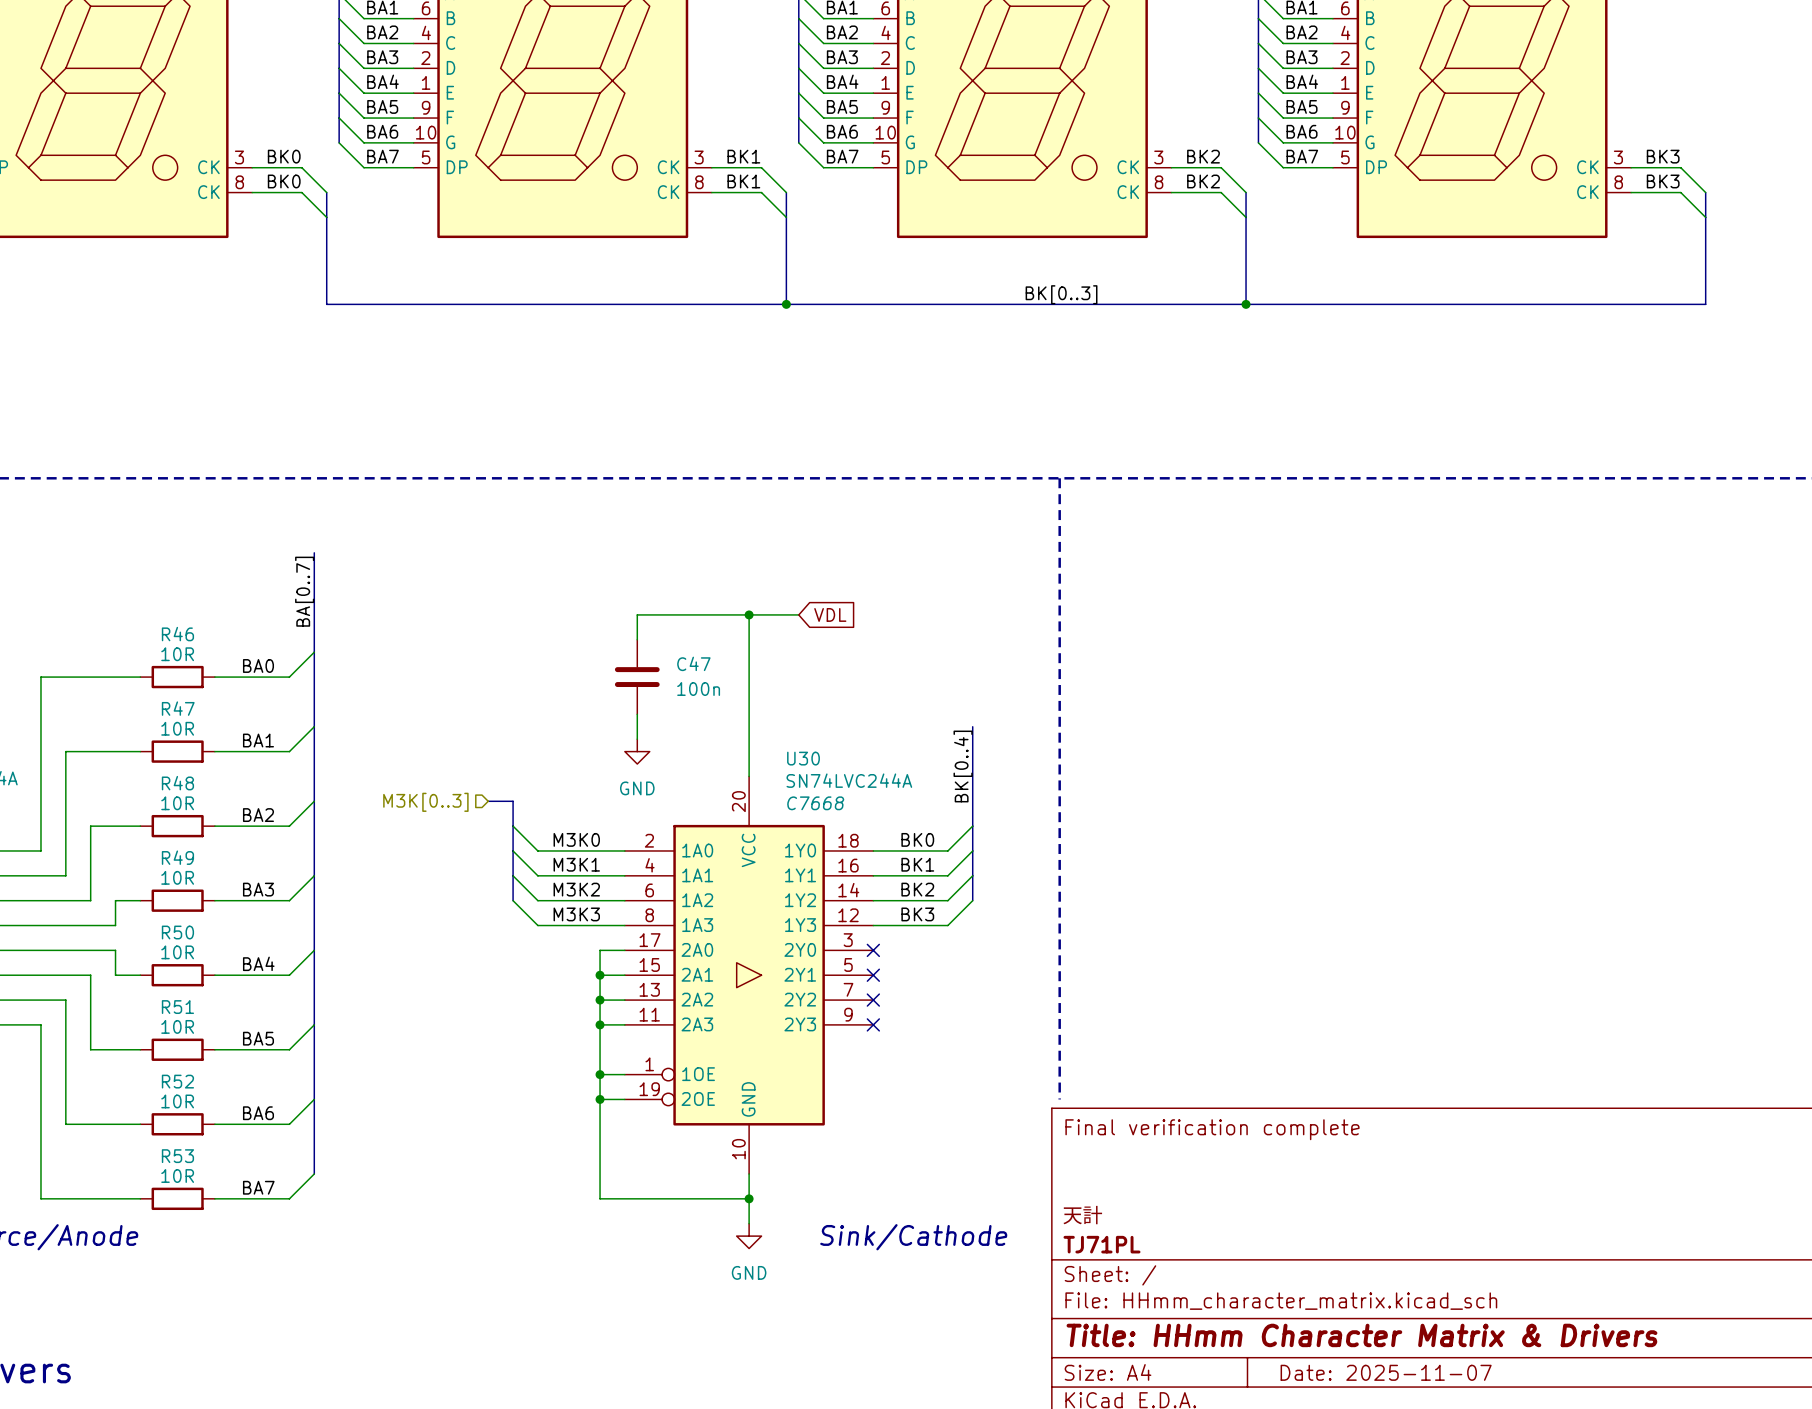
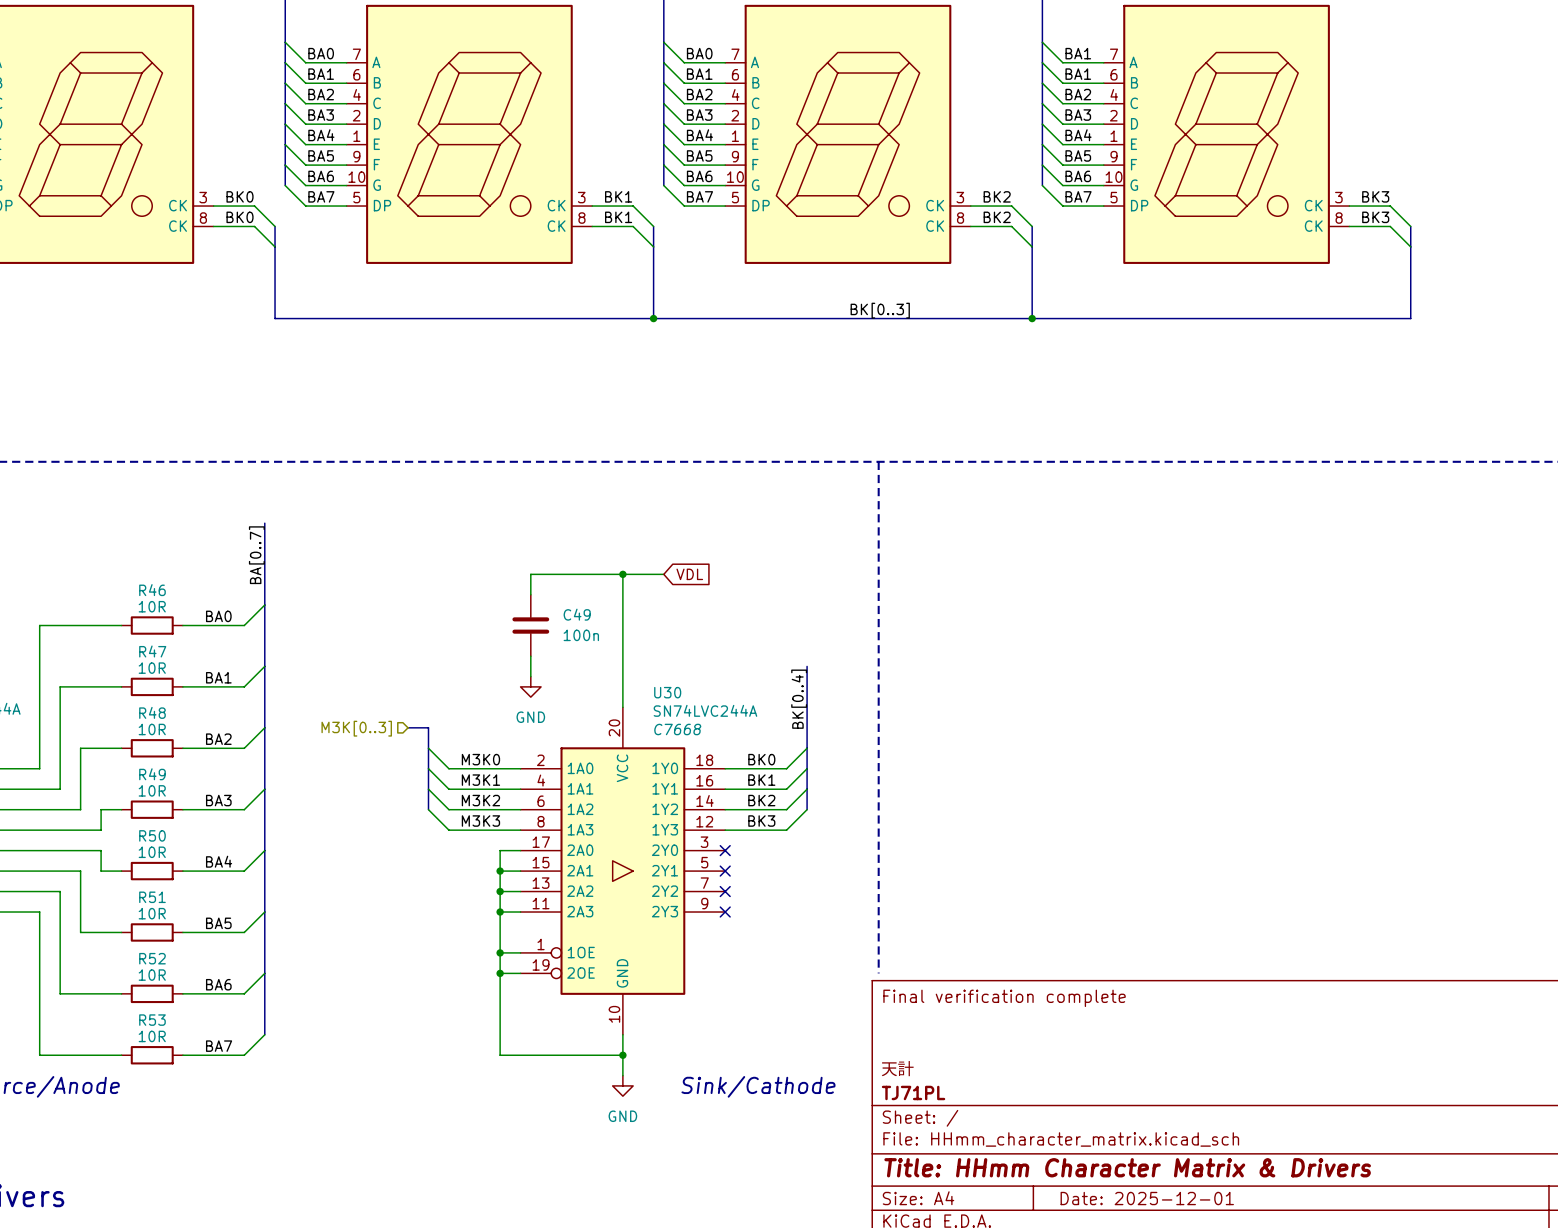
C47 name: C47 (693, 663) -> C49 (577, 614)
title block: Date: 2025-11-07 (1386, 1372) -> Date: 2025-12-01 (1147, 1198)

